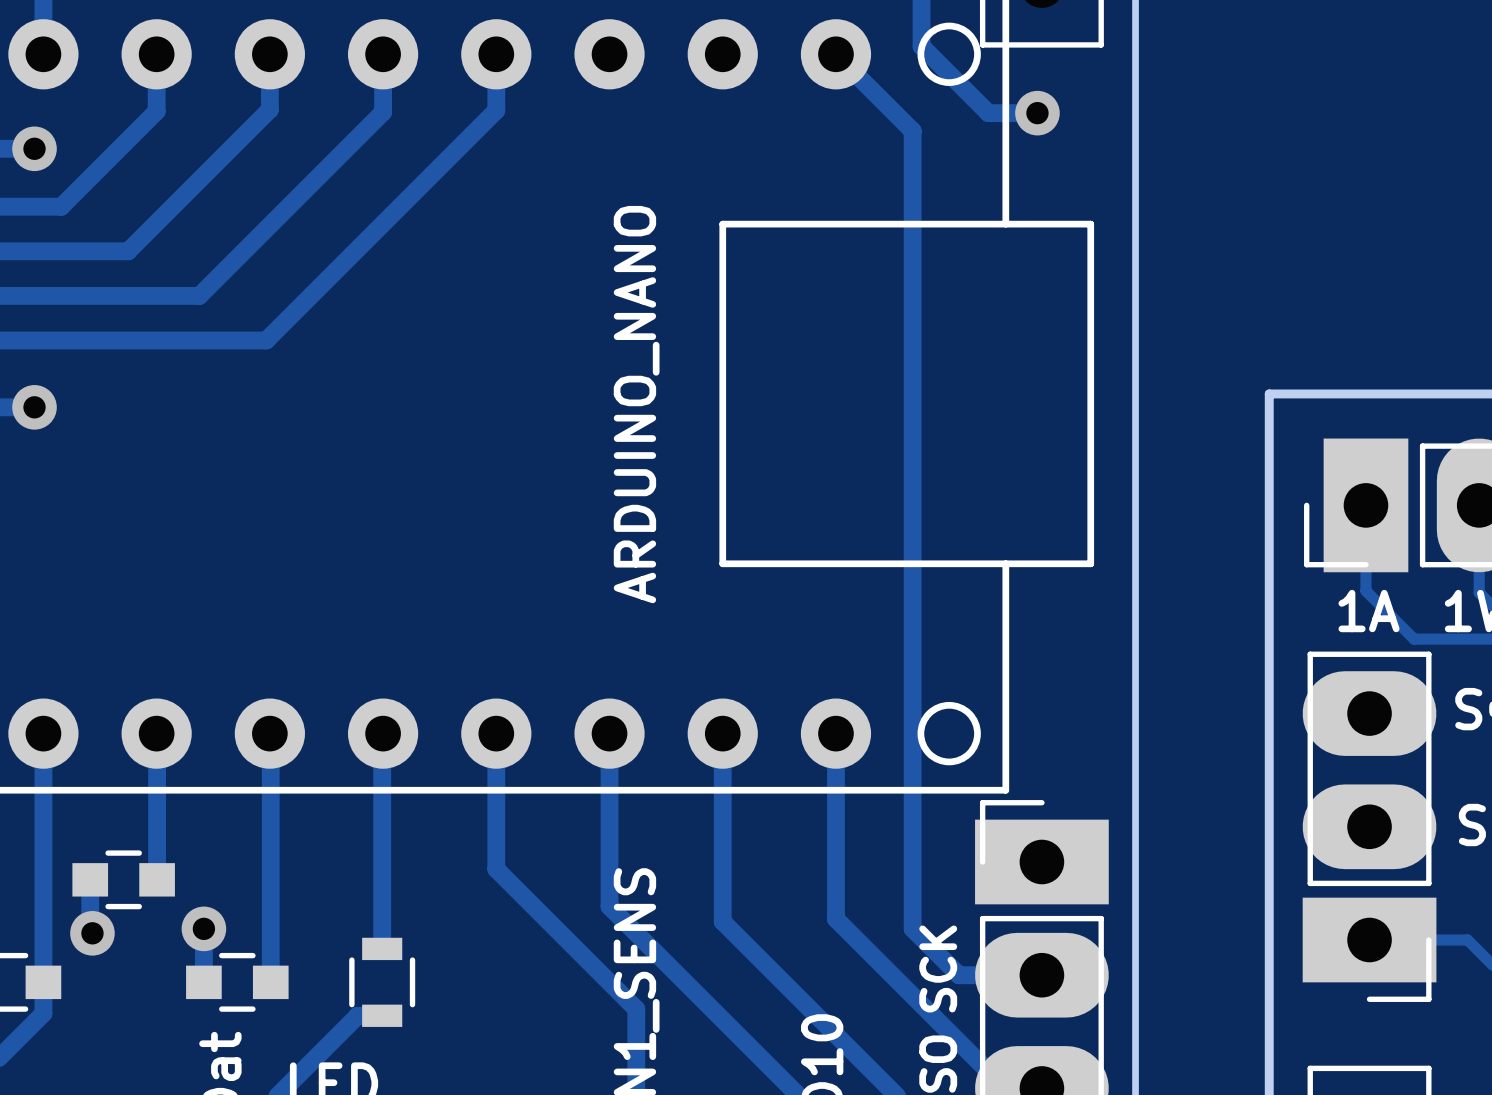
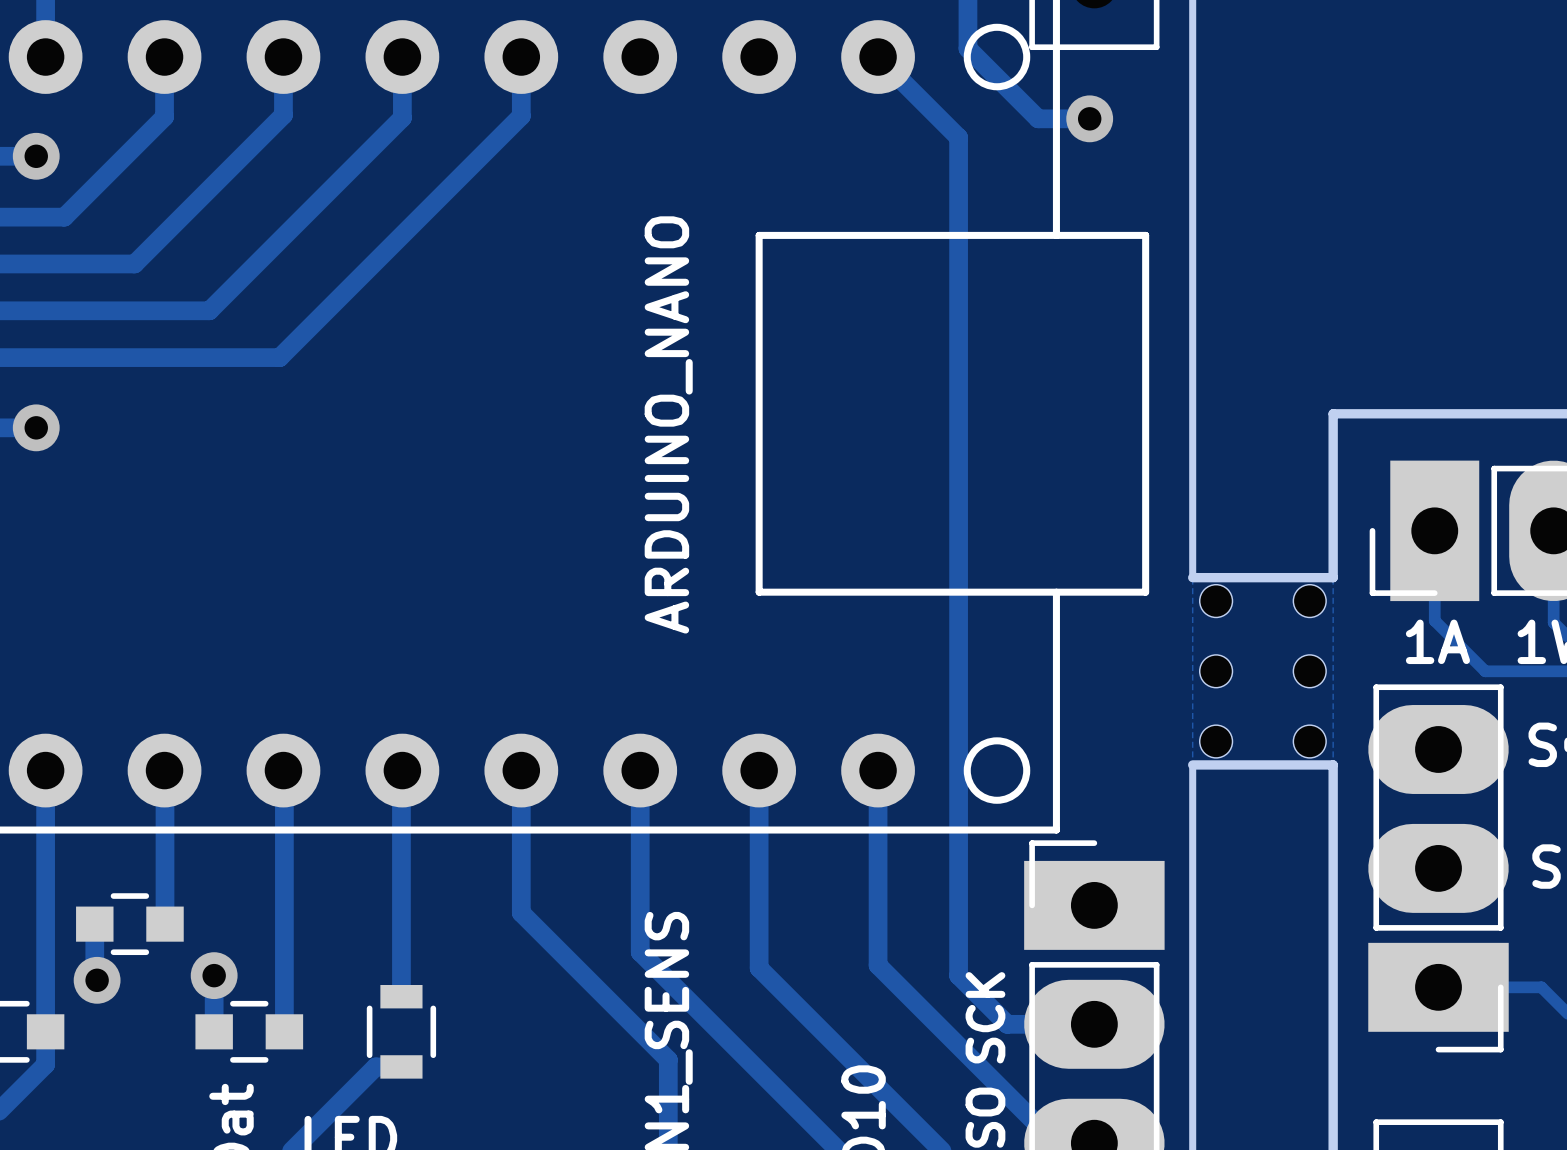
board edge: (1135, 549) (1135, 728) -> (1192, 577) (1333, 577)
board edge: (1269, 549) (1269, 728) -> (1192, 764) (1333, 764)
part: none -> (1216, 601)
part: none -> (1309, 601)
part: none -> (1216, 671)
part: none -> (1309, 671)
part: none -> (1216, 741)
part: none -> (1309, 741)

